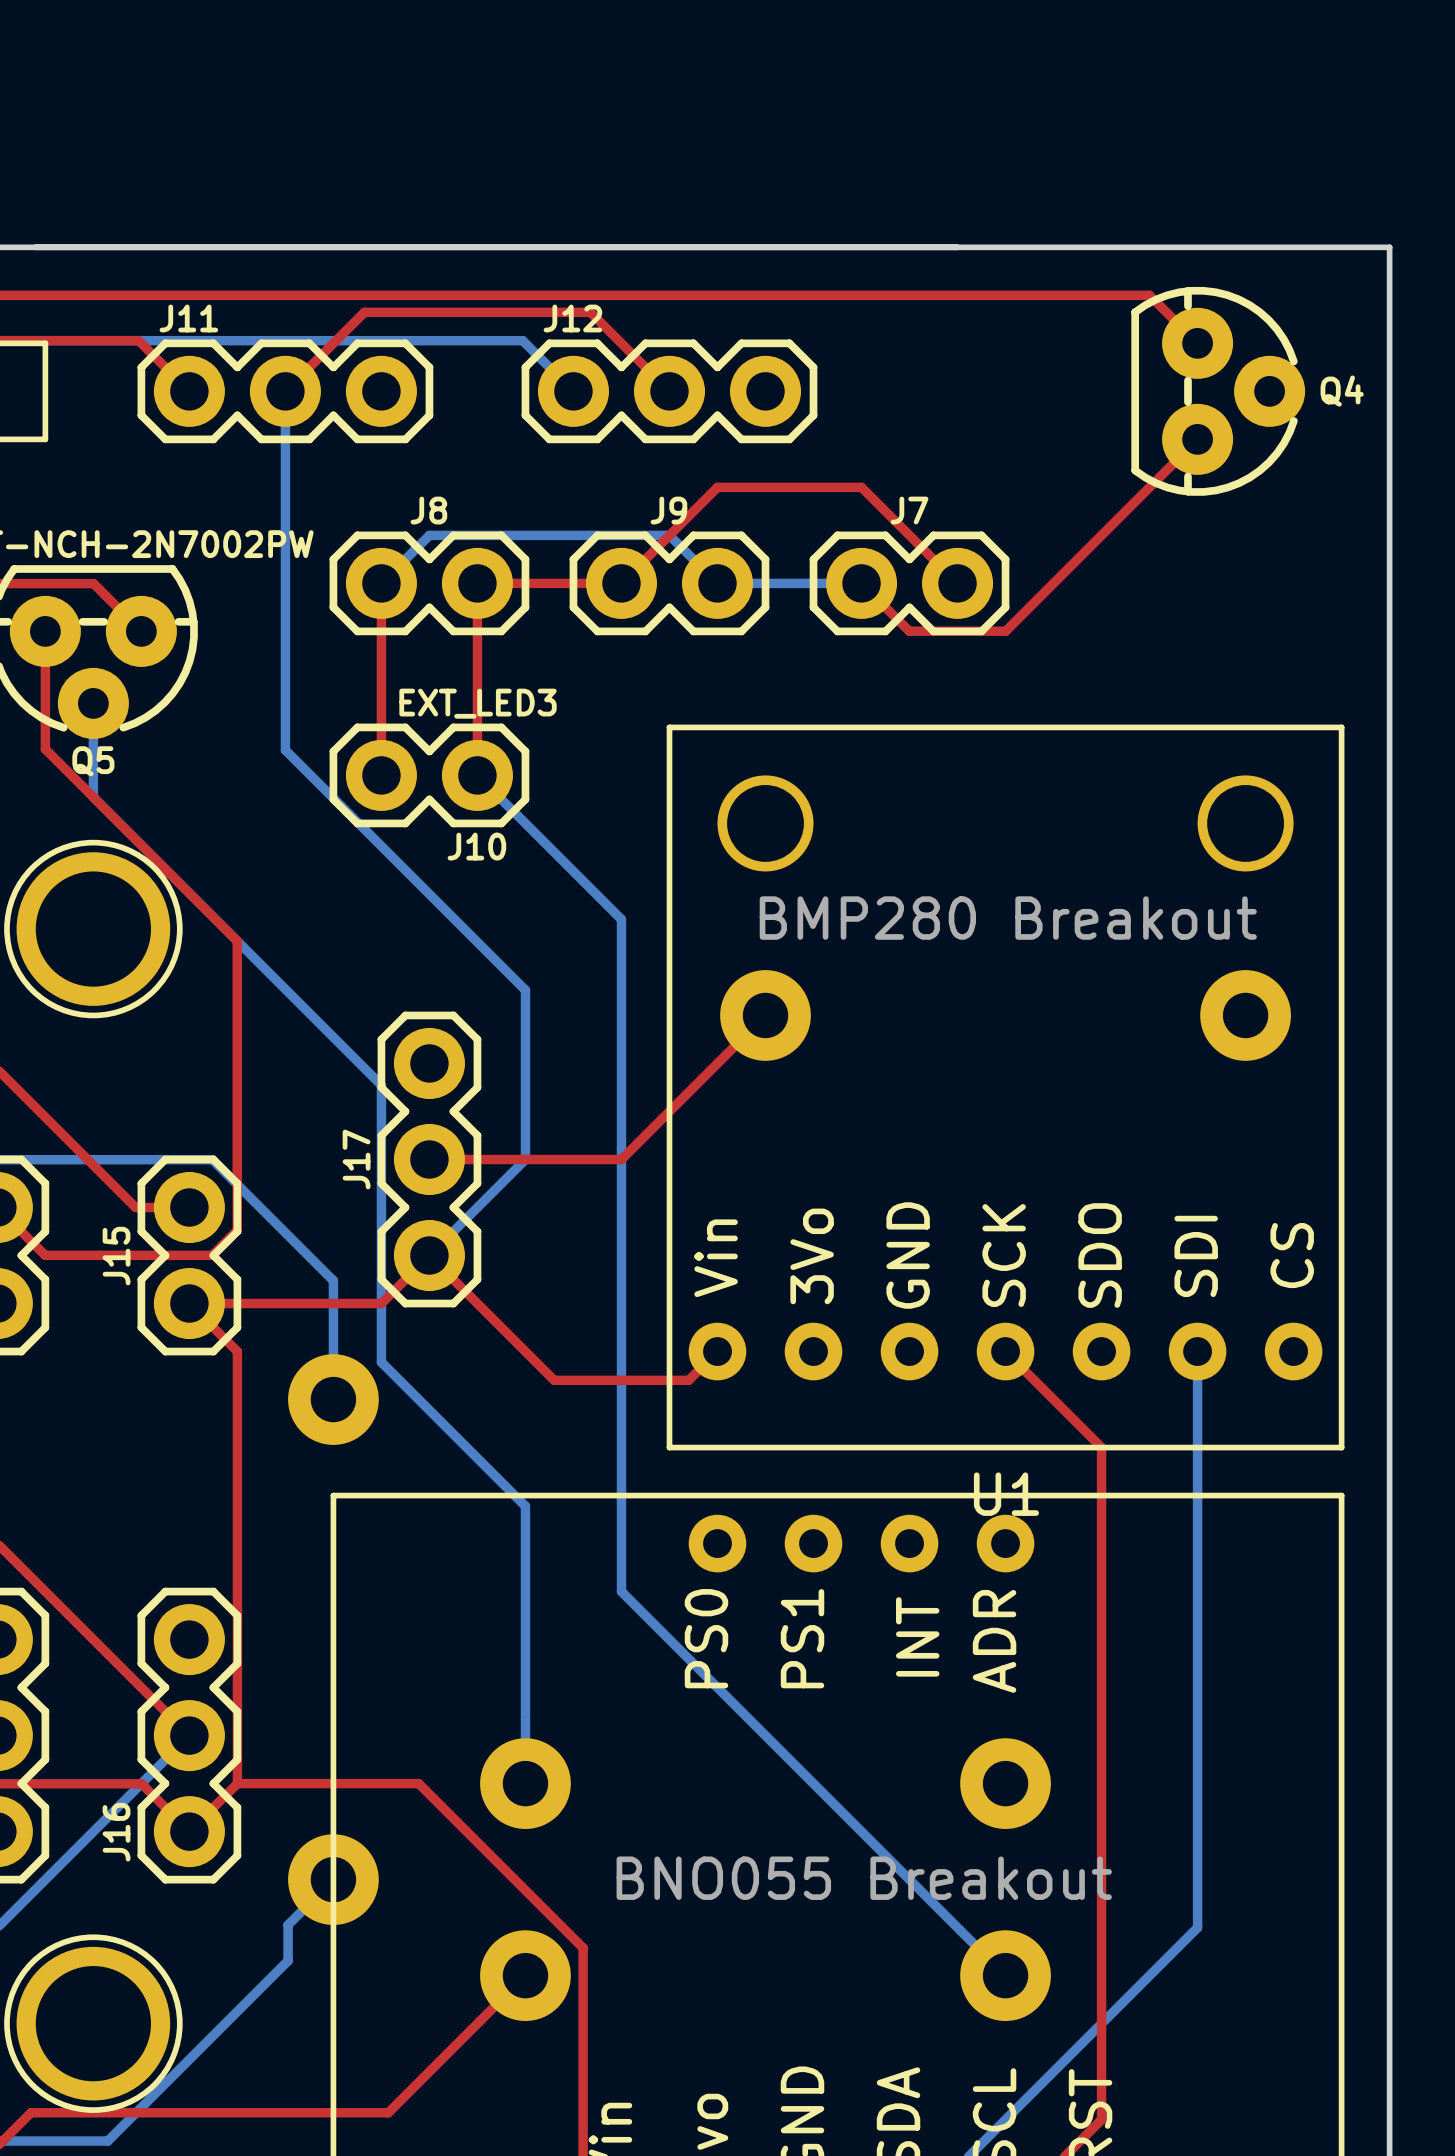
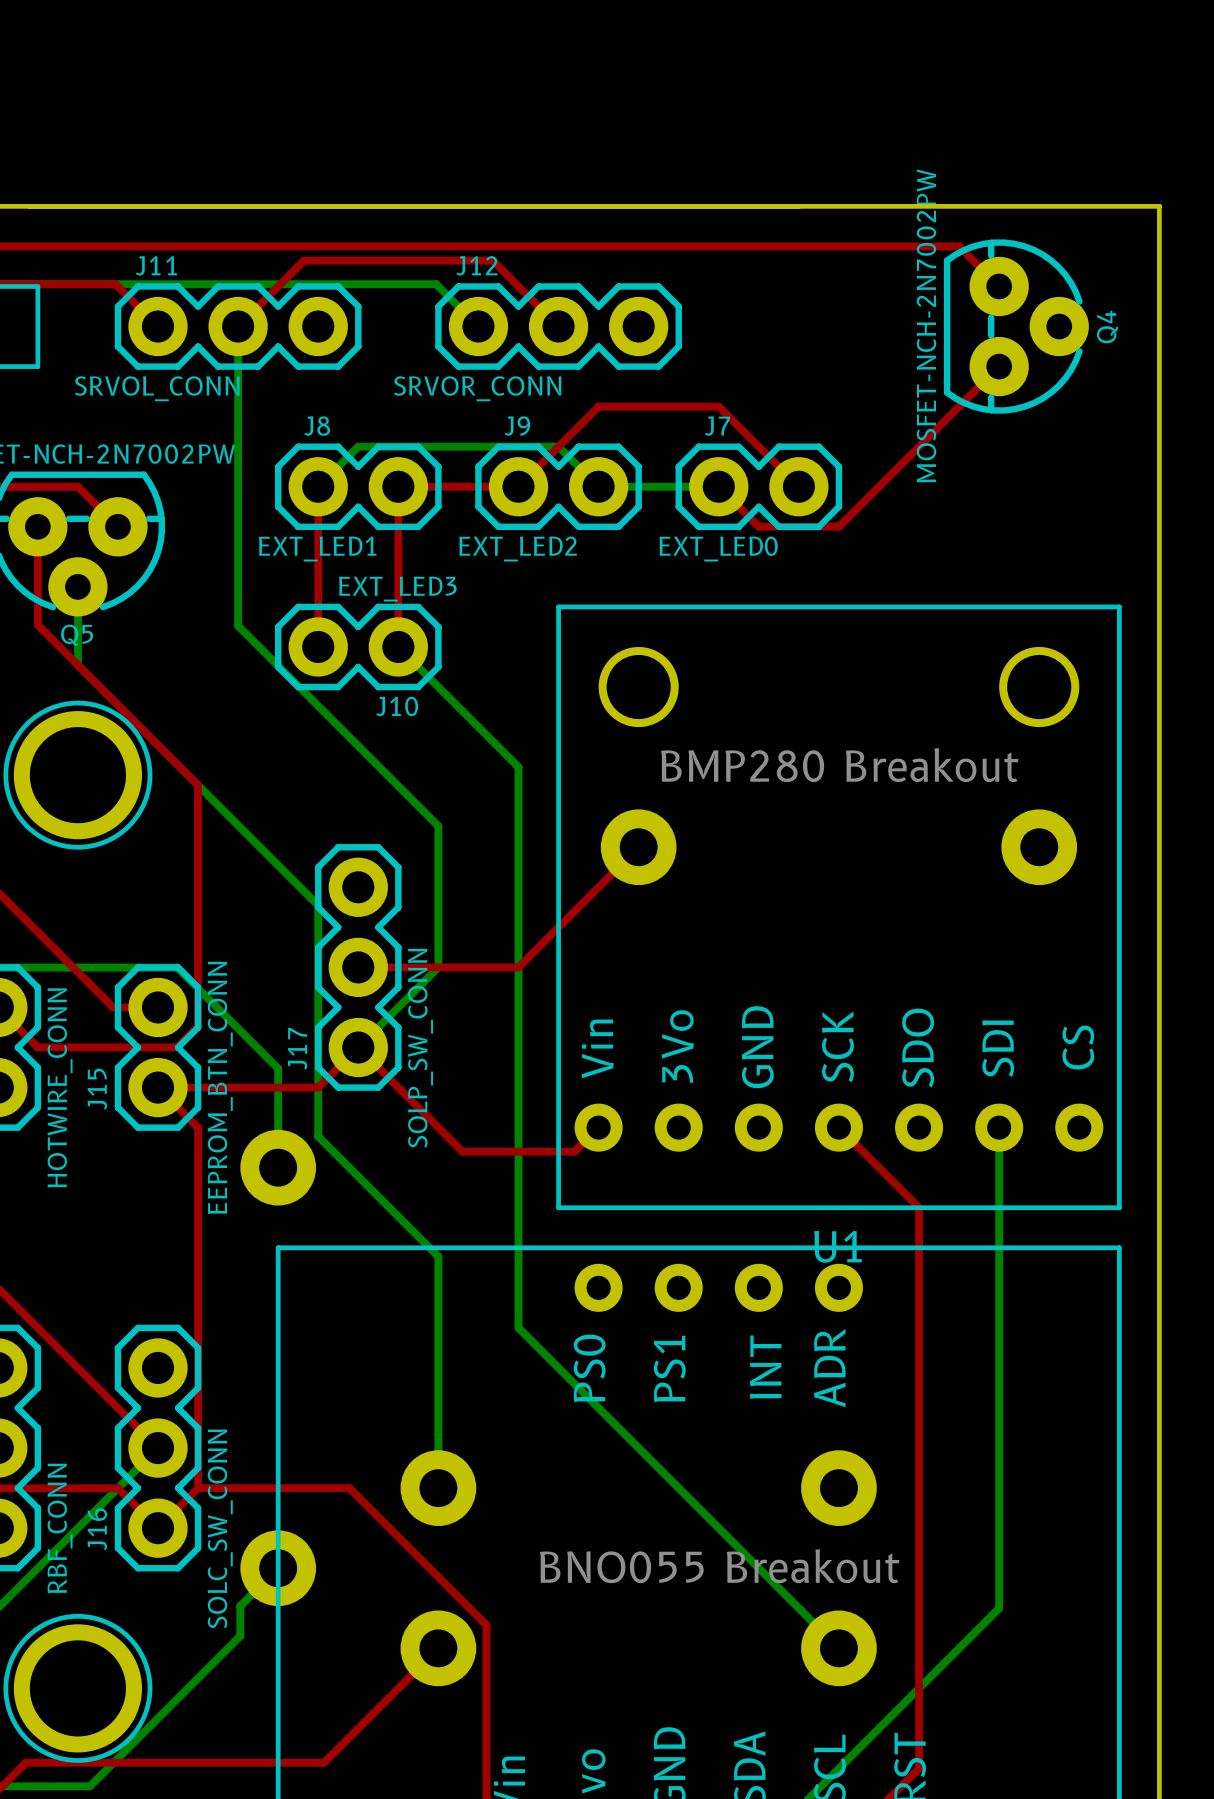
Q4 value: none -> MOSFET-NCH-2N7002PW (926, 325)
Q4 name rotation: 0° (1342, 391) -> 90° counterclockwise (1107, 327)
J11 value: none -> SRVOL_CONN (157, 388)
J12 value: none -> SRVOR_CONN (477, 388)
J8 name position: J8 (428, 510) -> J8 (317, 426)
J9 name position: J9 (668, 510) -> J9 (517, 426)
J7 name position: J7 (909, 510) -> J7 (717, 426)
J8 value: none -> EXT_LED1 (317, 548)
J9 value: none -> EXT_LED2 (517, 548)
J7 value: none -> EXT_LED0 (718, 548)
J17 name position: J17 (356, 1159) -> J17 (297, 1048)
J15 name position: J15 (116, 1256) -> J15 (97, 1089)
J17 value: none -> SOLP_SW_CONN (420, 1048)
part value: none -> HOTWIRE_CONN (60, 1087)
J15 value: none -> EEPROM_BTN_CONN (220, 1087)
part value: none -> RBF_CONN (60, 1528)
J16 value: none -> SOLC_SW_CONN (220, 1528)

